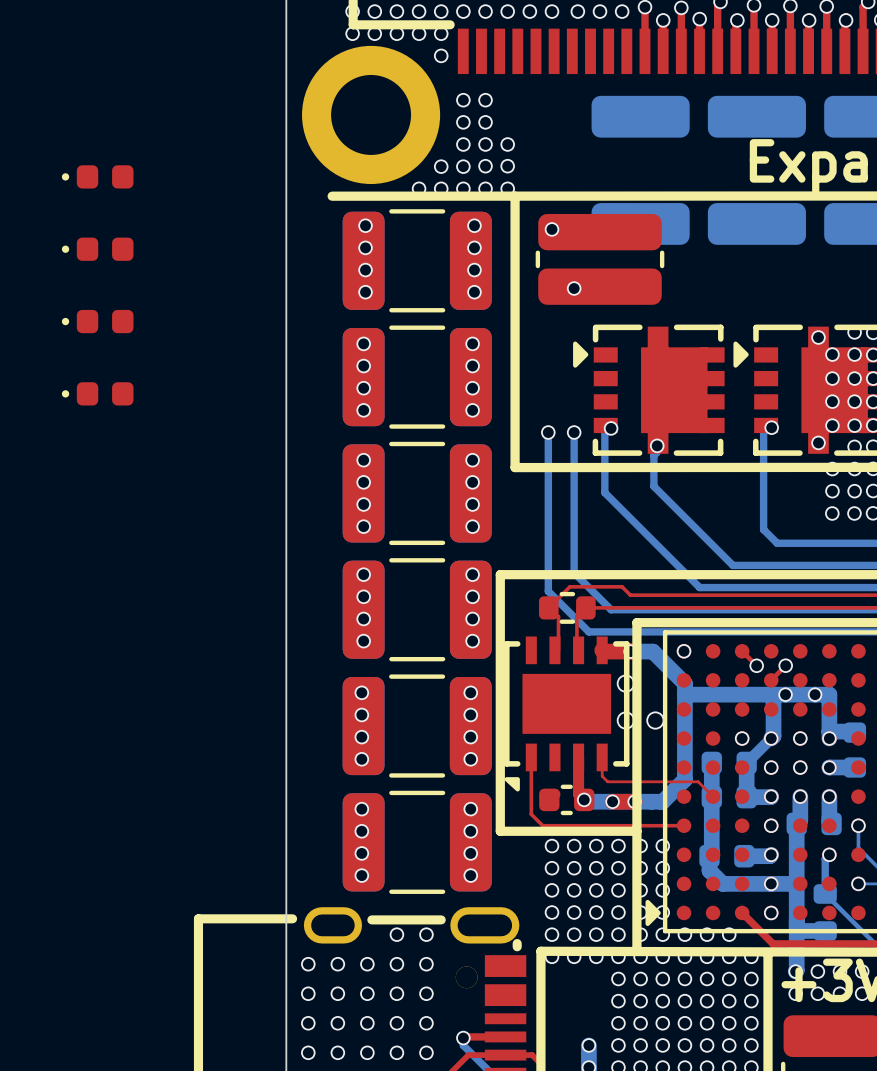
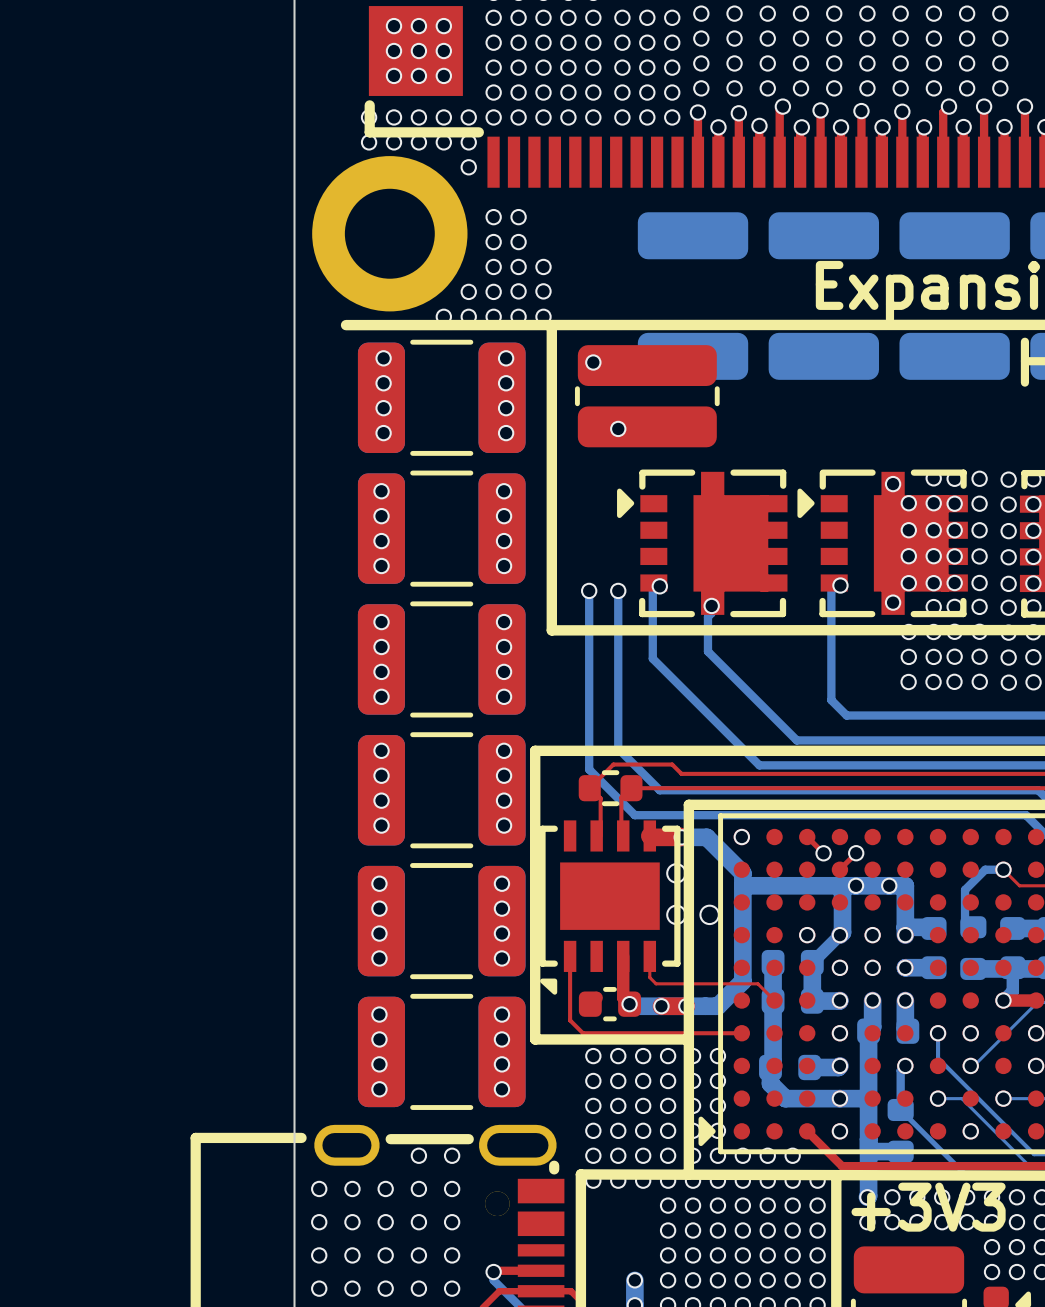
part: (97, 176) -> none
part: (97, 249) -> none
part: (97, 321) -> none
part: (97, 393) -> none

